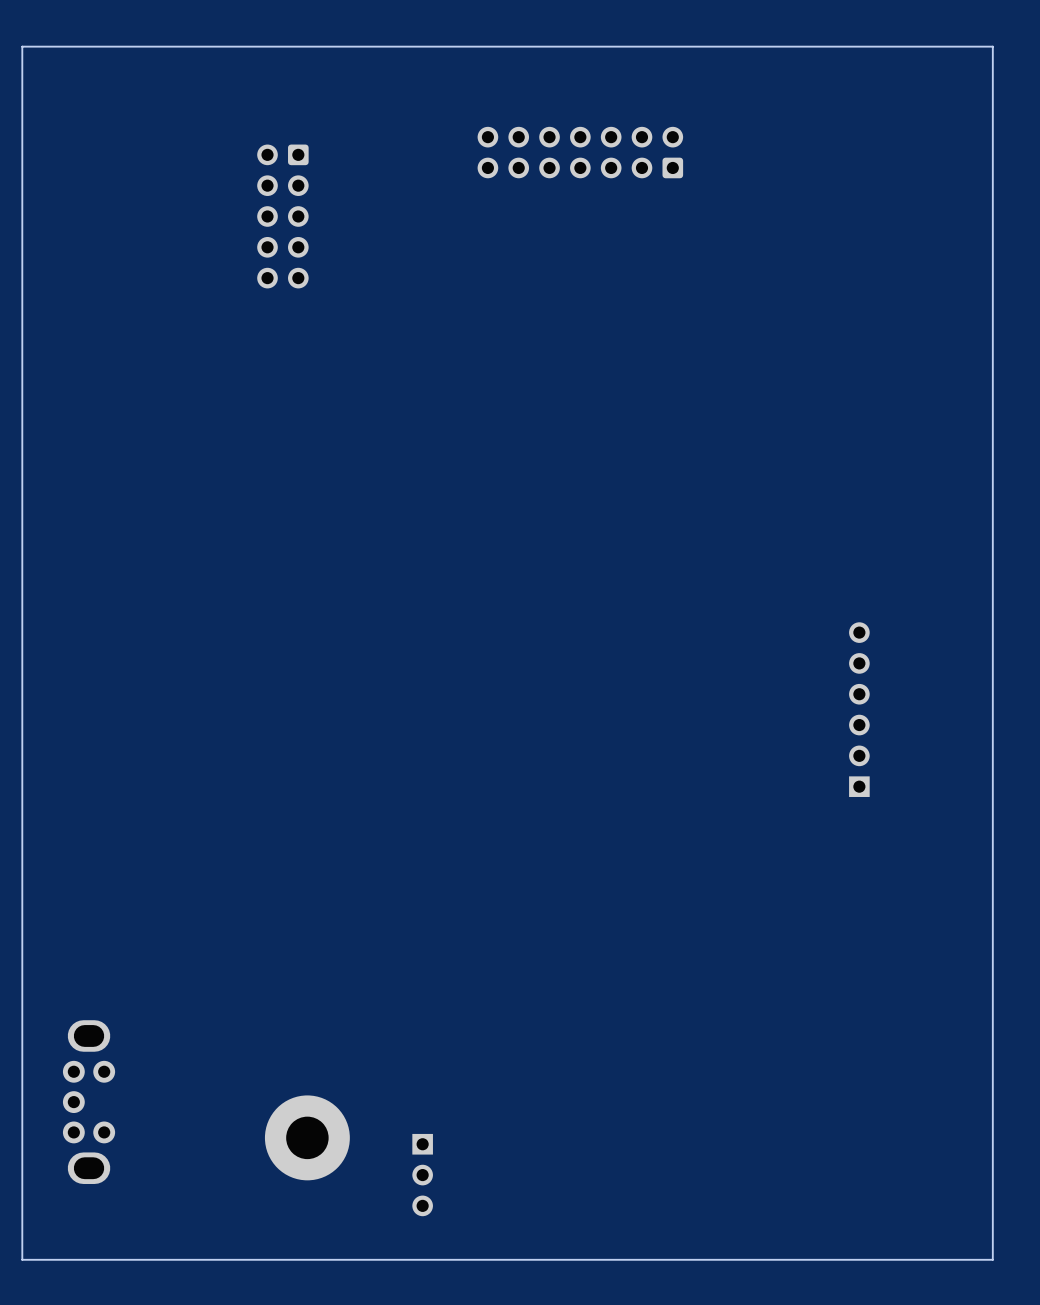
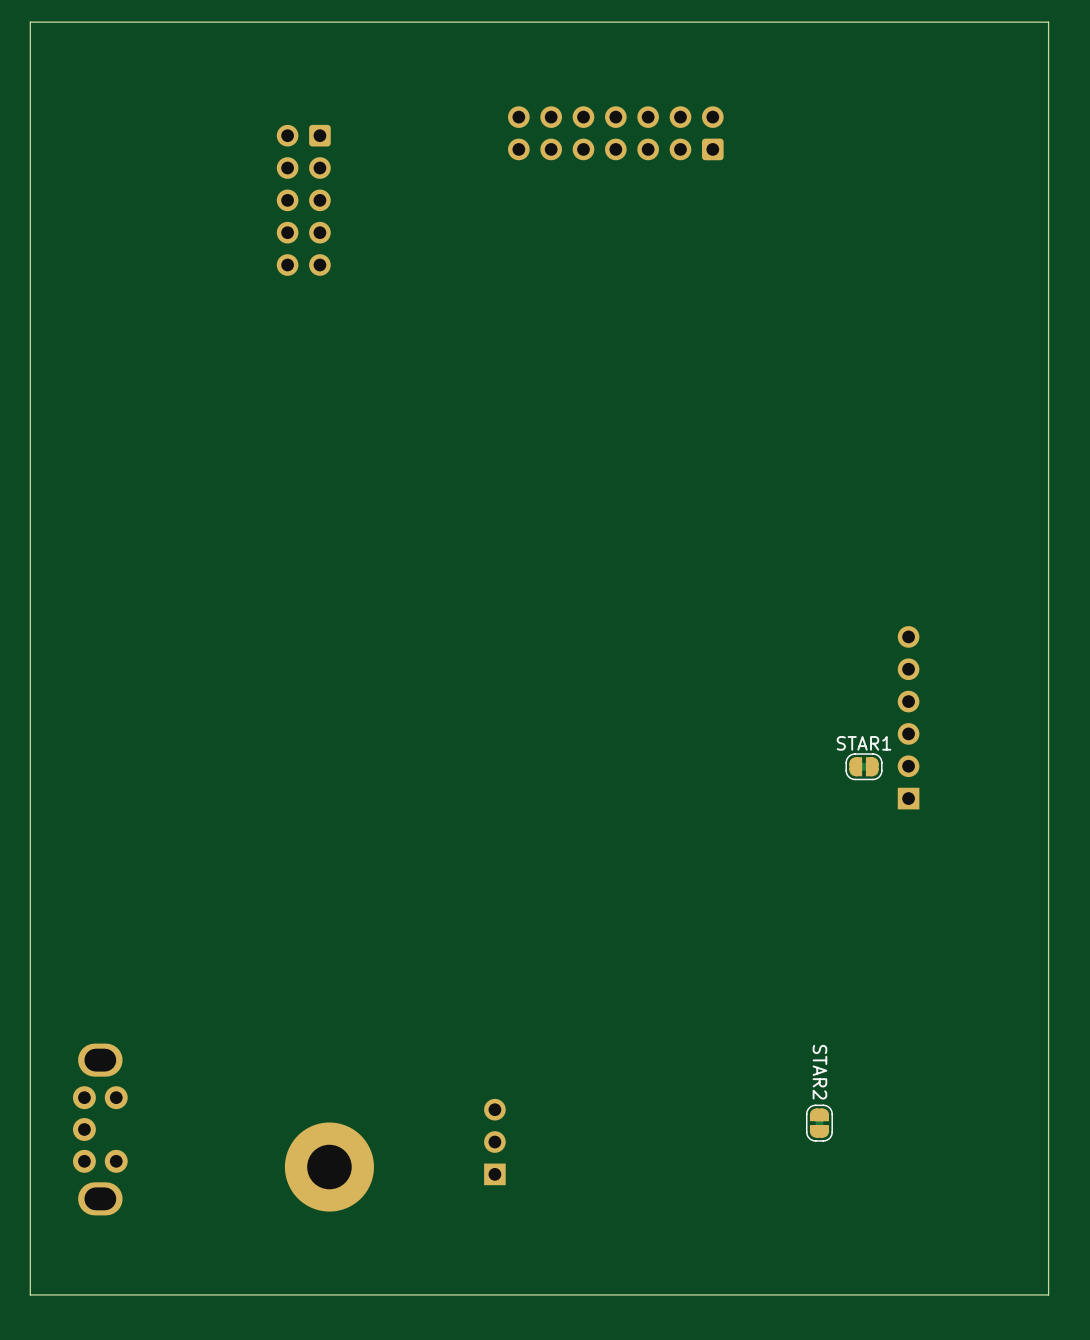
STAR1: none -> (864, 766)
STAR2: none -> (819, 1123)
part rotation: 0° (422, 1175) -> 180° (494, 1142)
part position: (422, 1175) -> (494, 1142)

